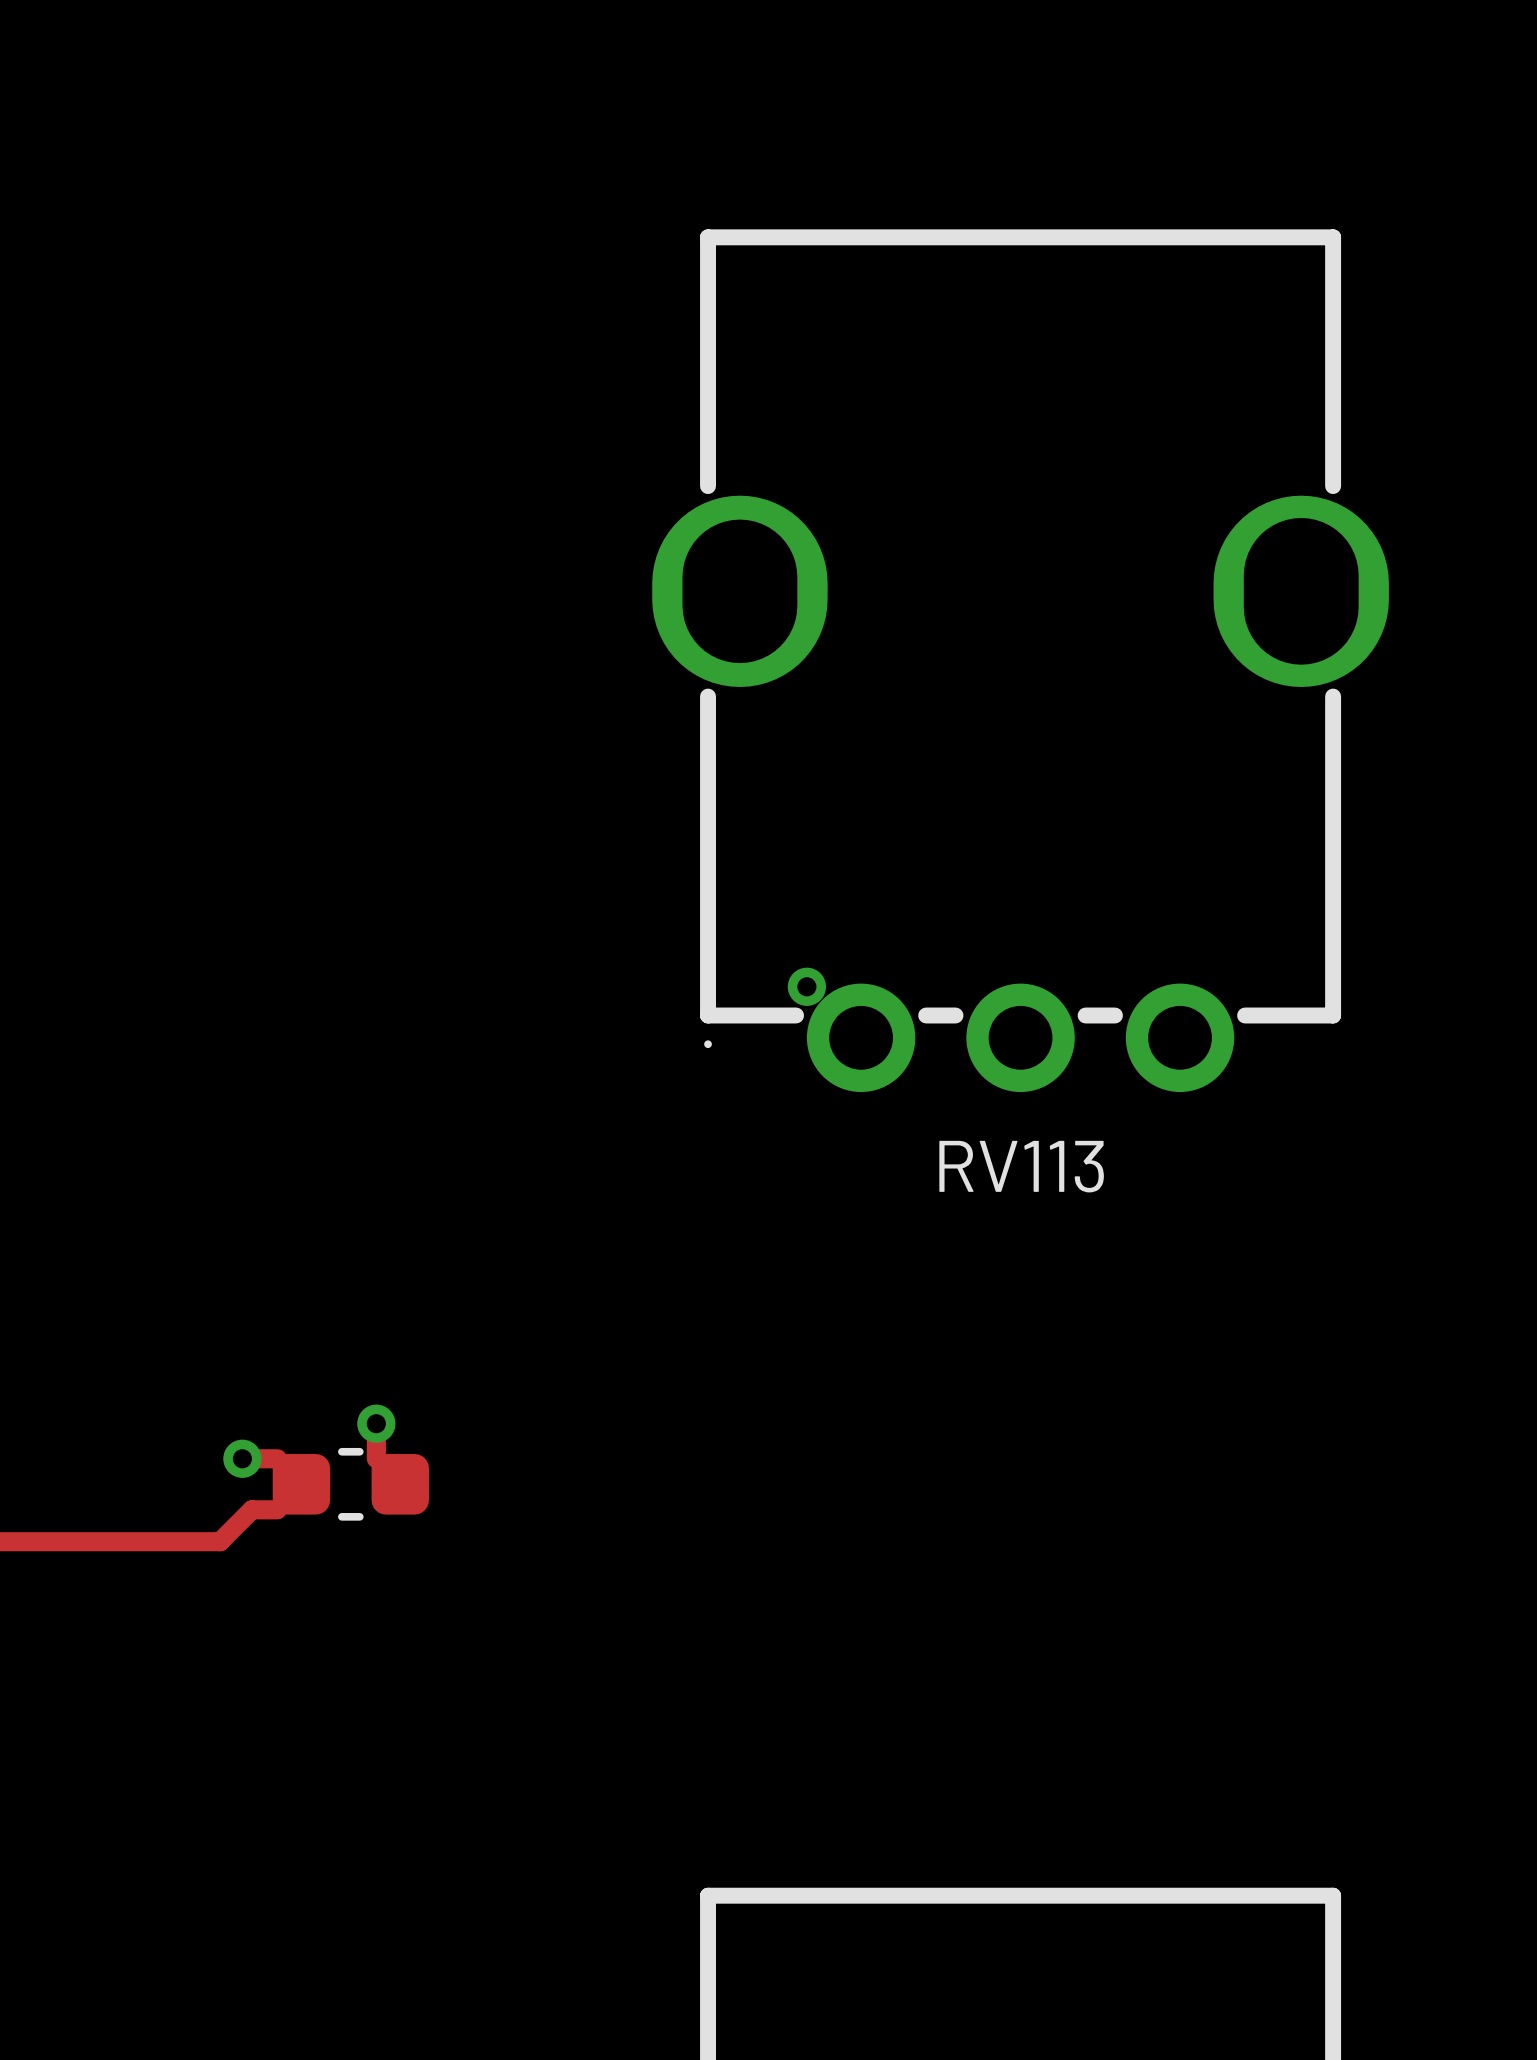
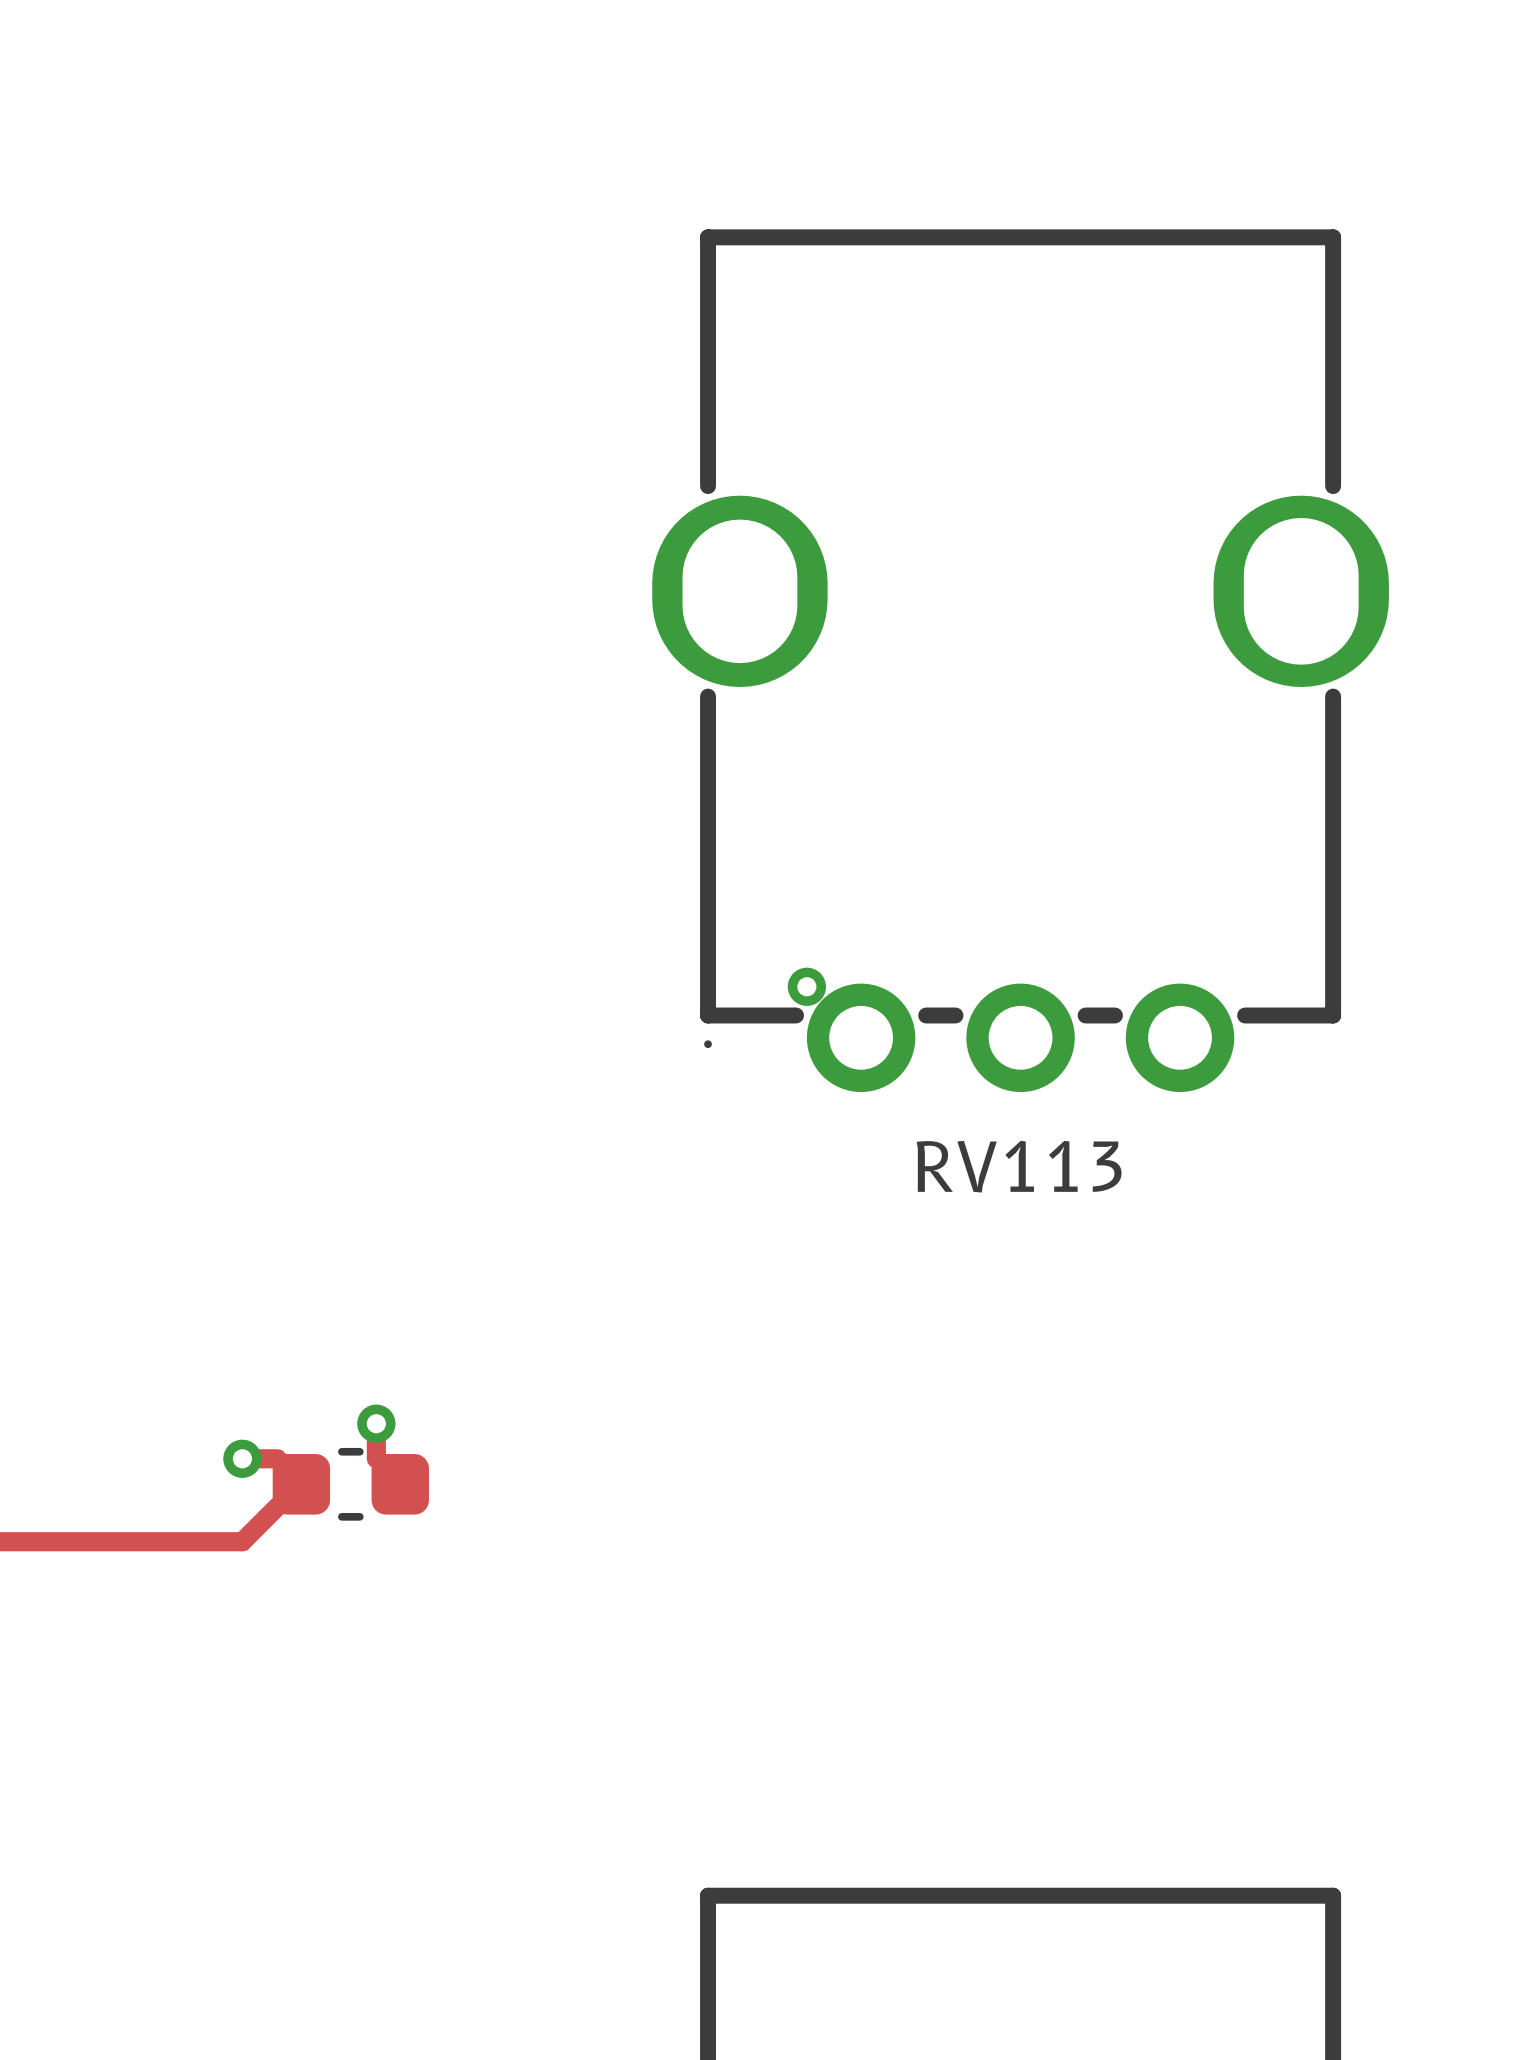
top track: (277, 1509) (251, 1509) (220, 1541) -> (277, 1506) (242, 1541) (220, 1541)

